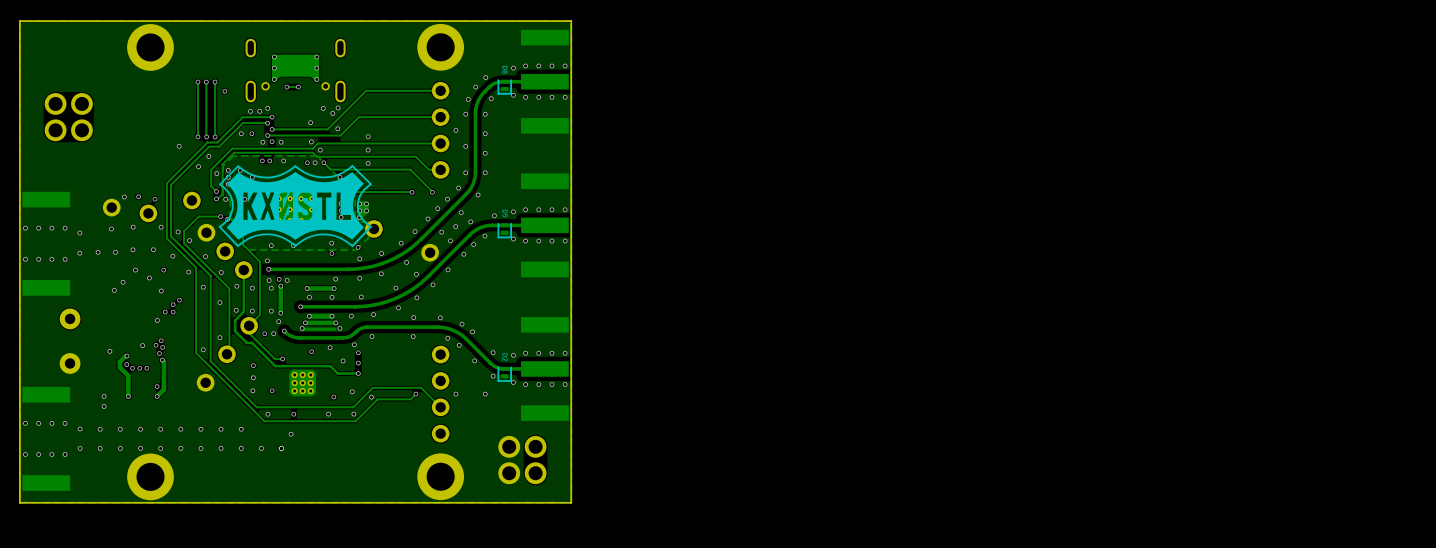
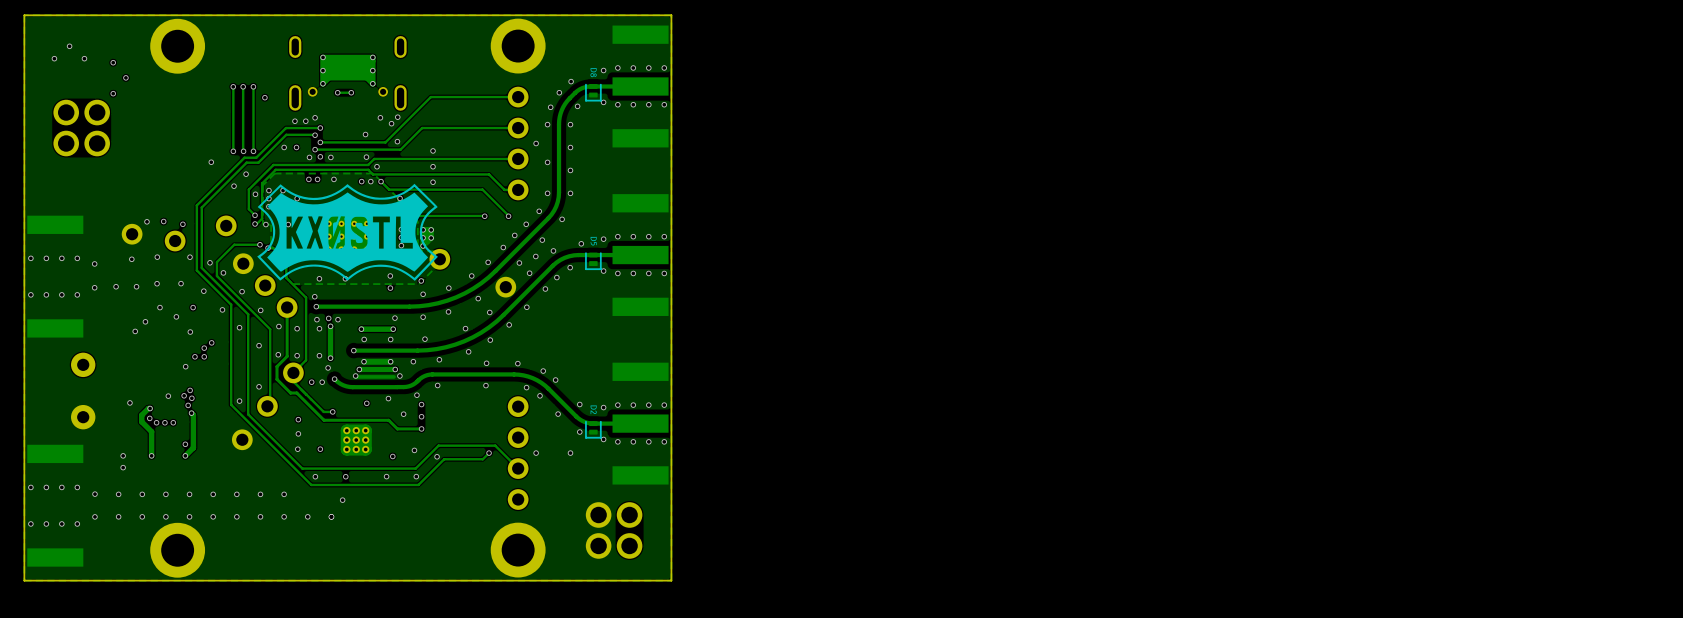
via: none -> (69, 46)
via: none -> (54, 58)
via: none -> (84, 58)
via: none -> (113, 62)
via: none -> (125, 77)
via: none -> (113, 93)

